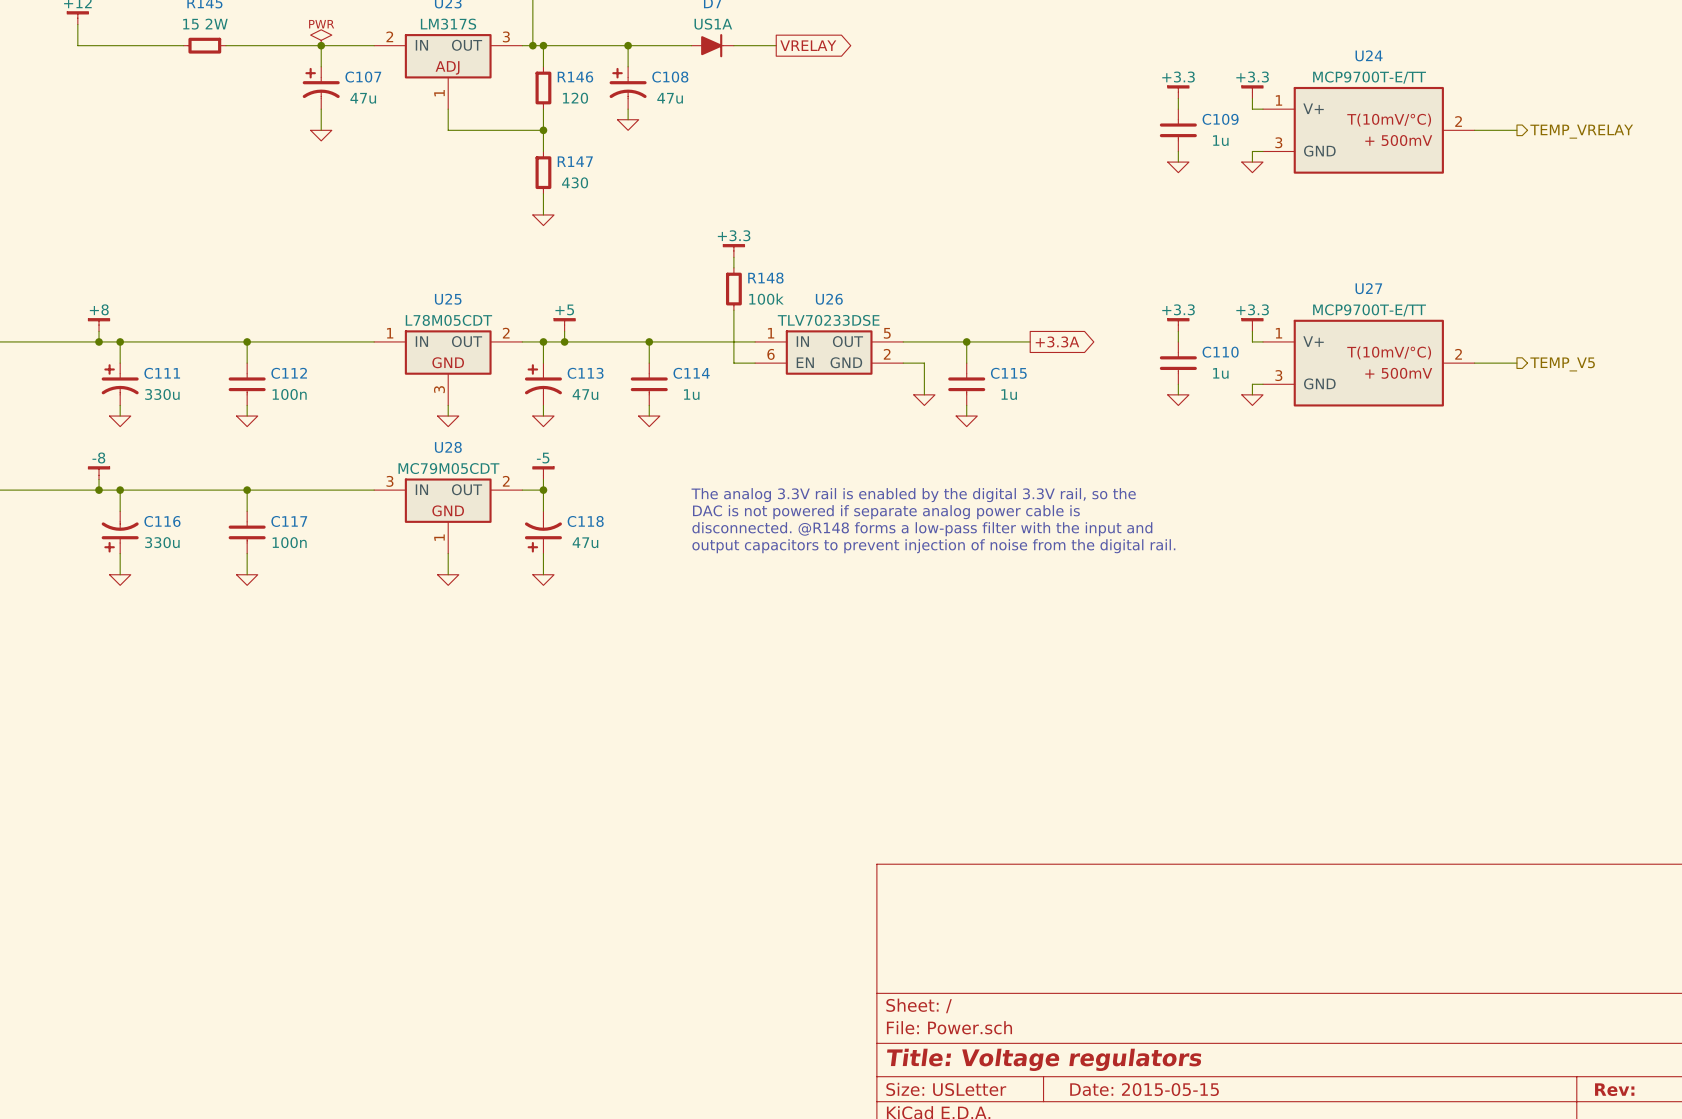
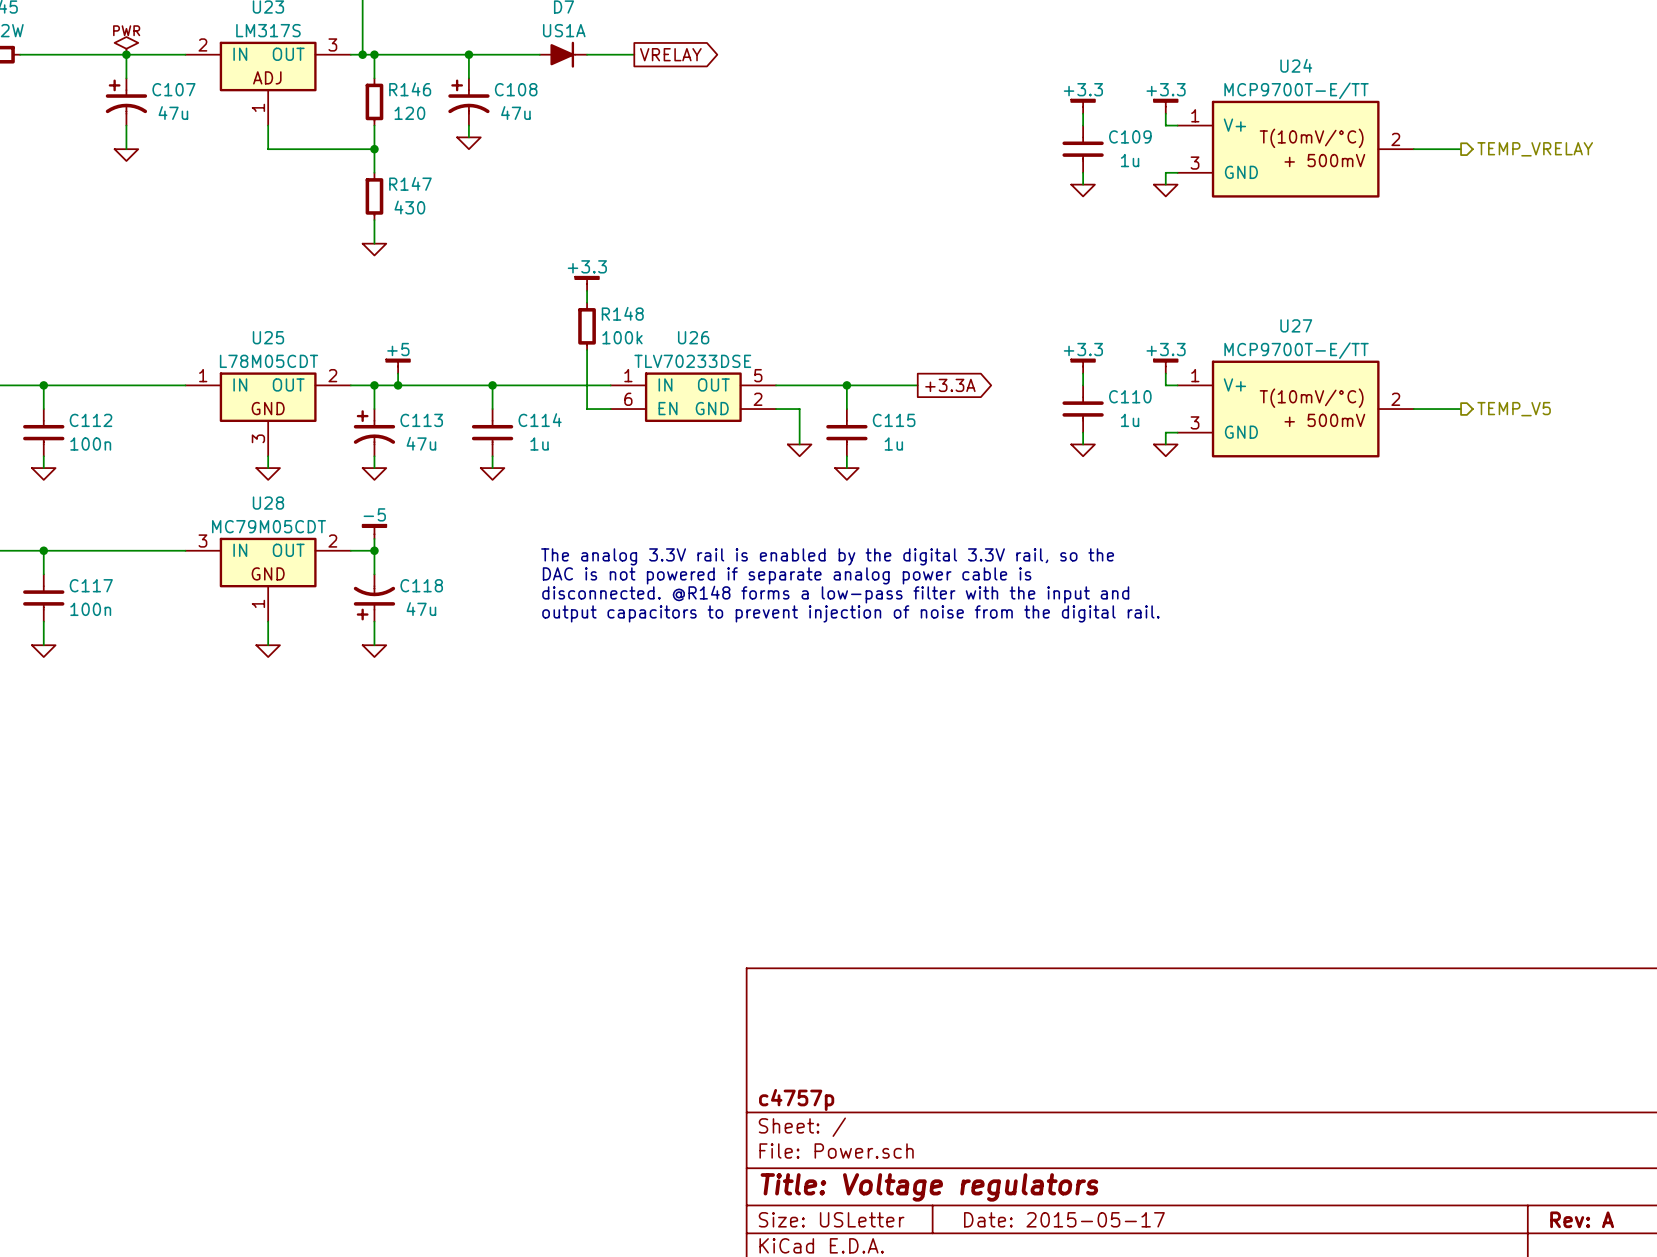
title block: none -> c4757p (796, 1099)
title block: Date: 2015-05-15 (1144, 1089) -> Date: 2015-05-17 (1064, 1219)
title block: Rev: (1614, 1089) -> Rev: A (1582, 1219)

